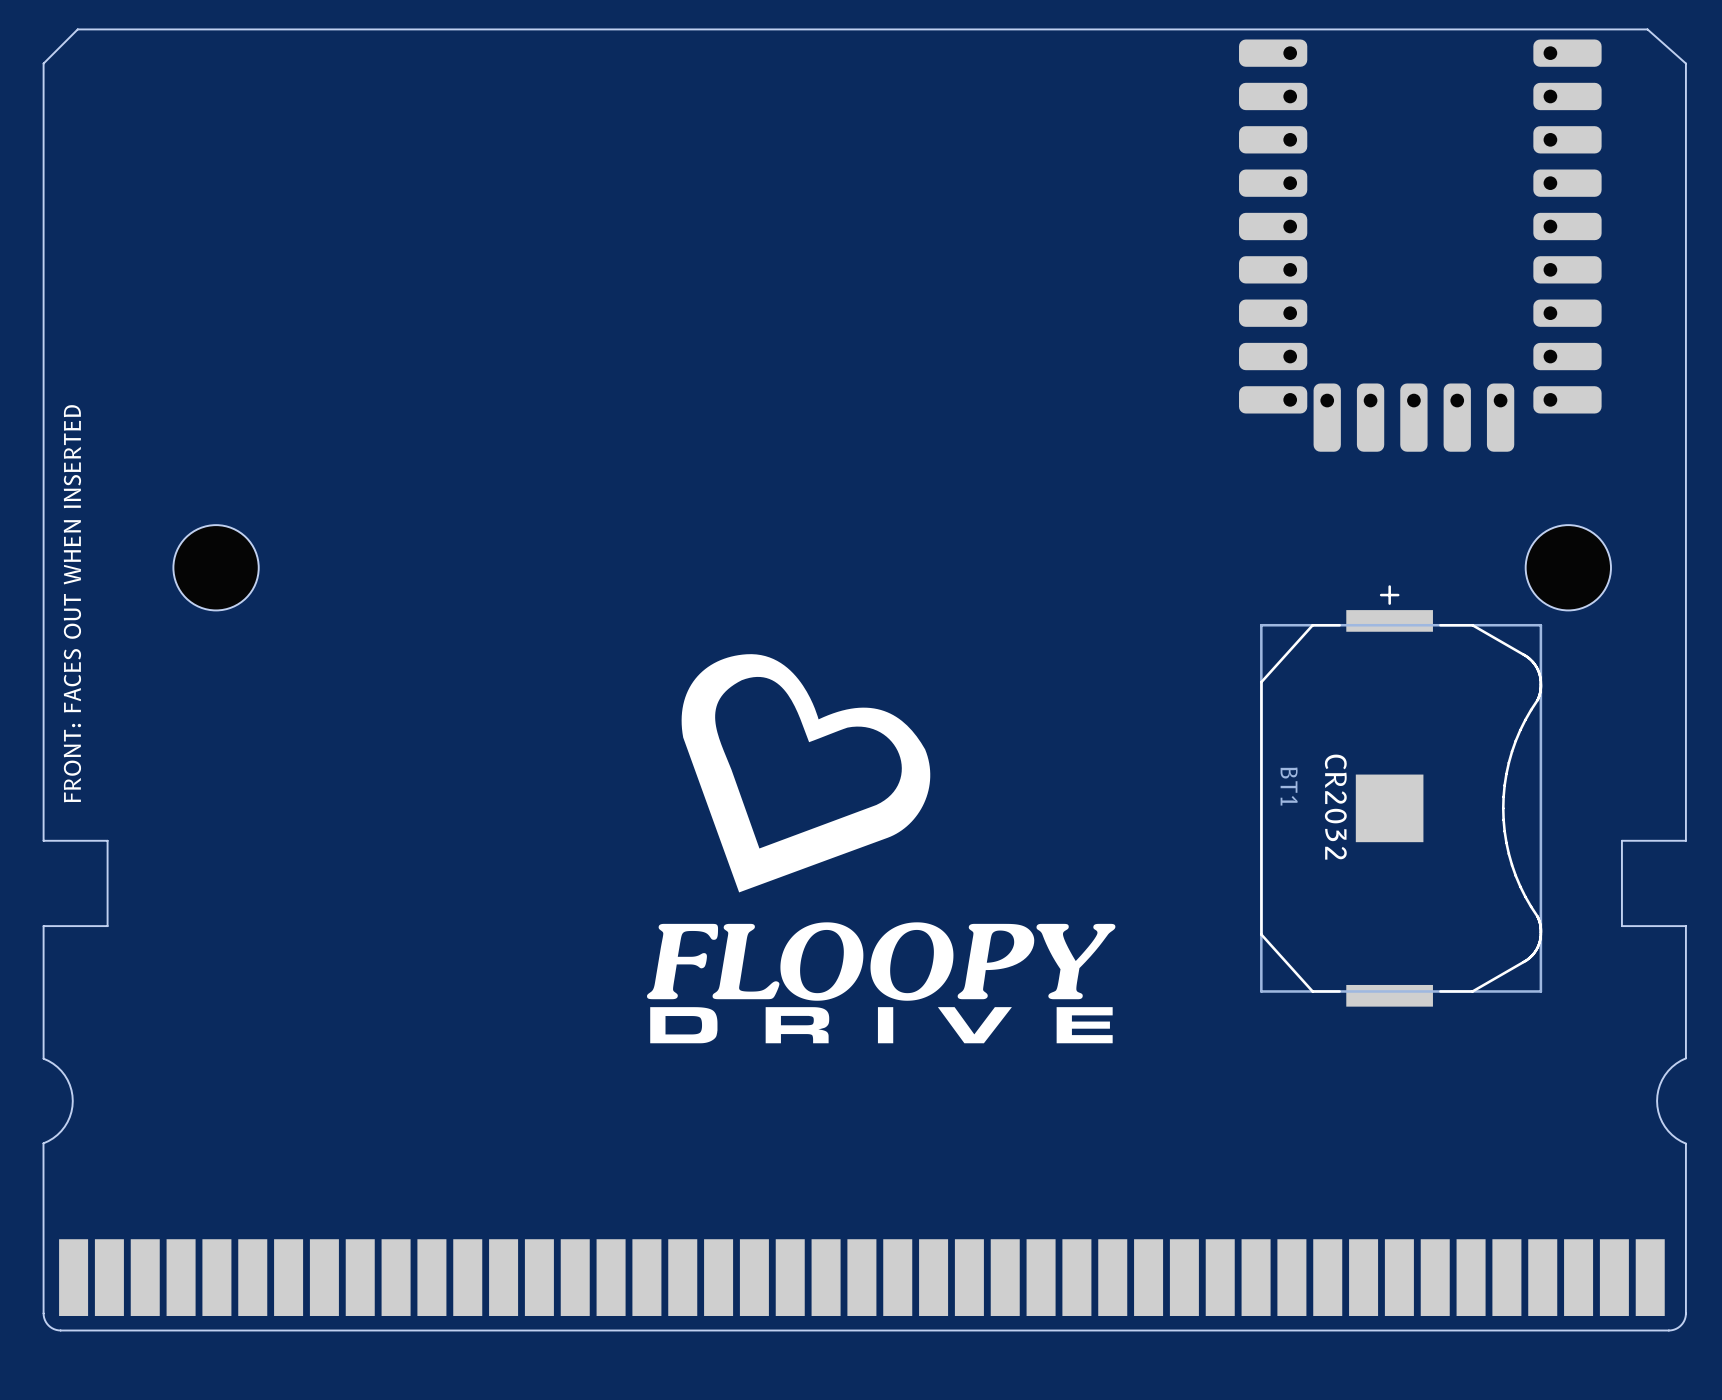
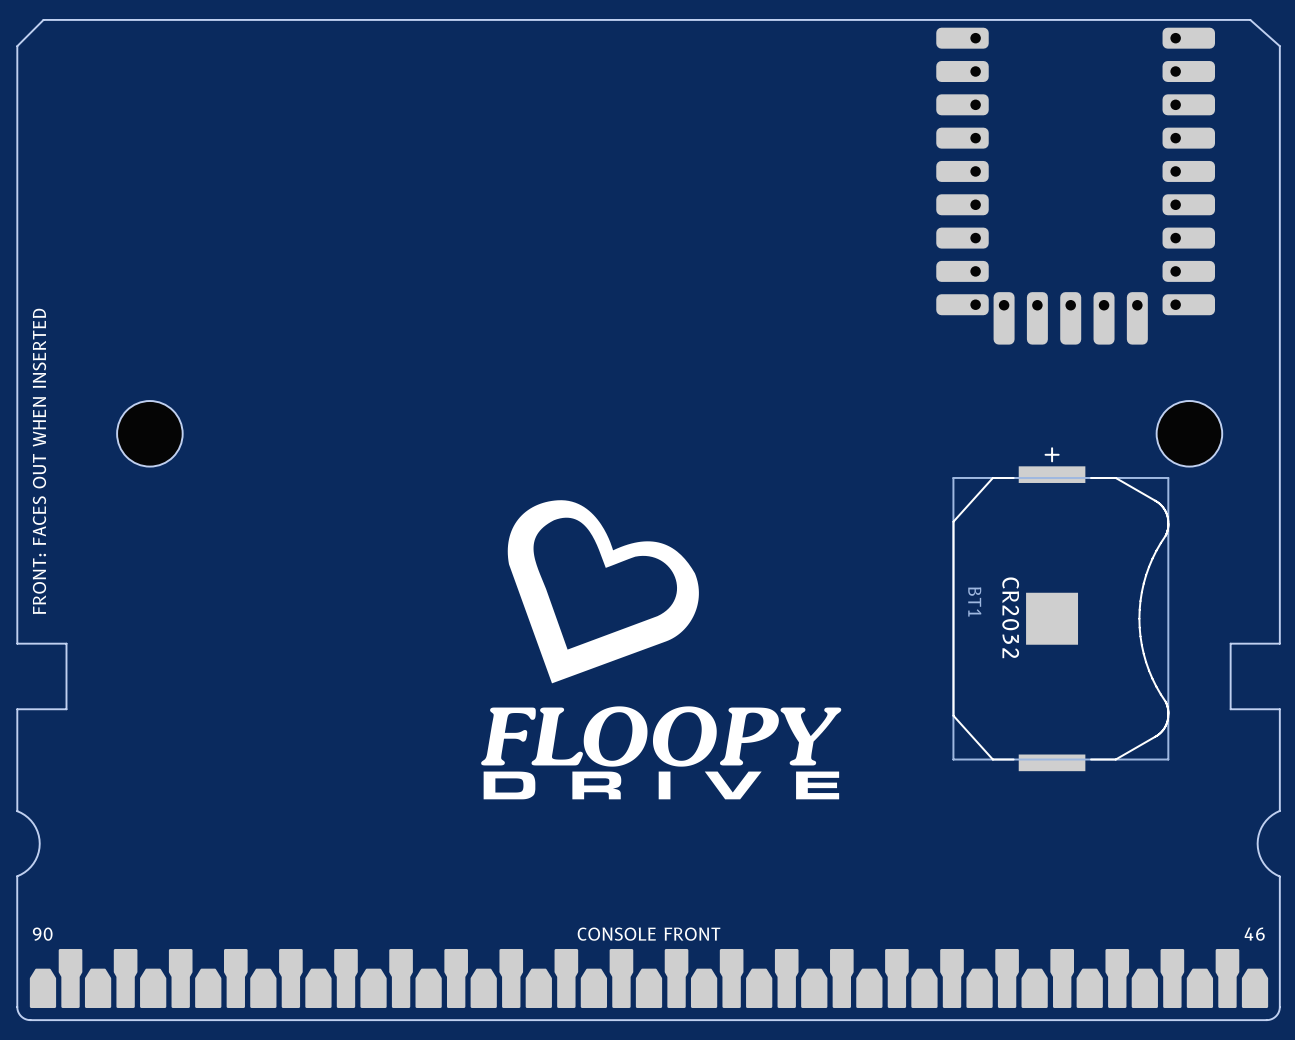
part footprint: [59, 1239, 1665, 1317] -> [29, 948, 1269, 1009]

